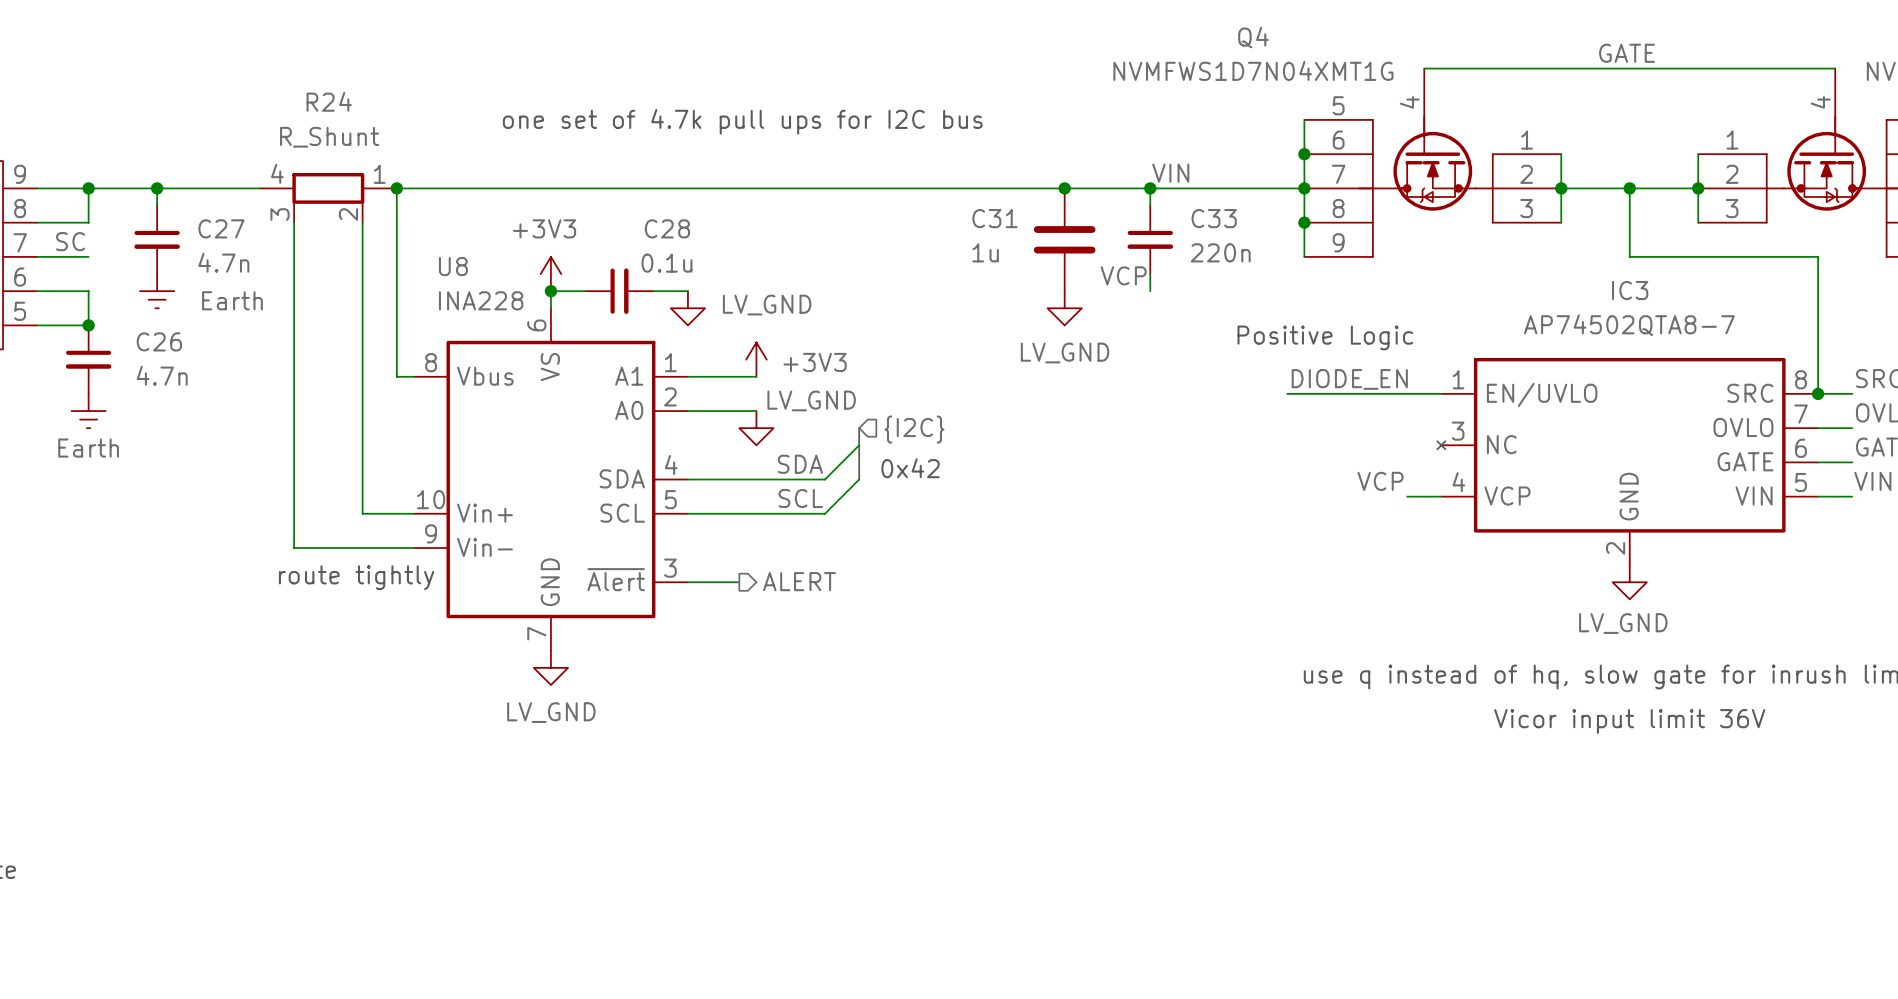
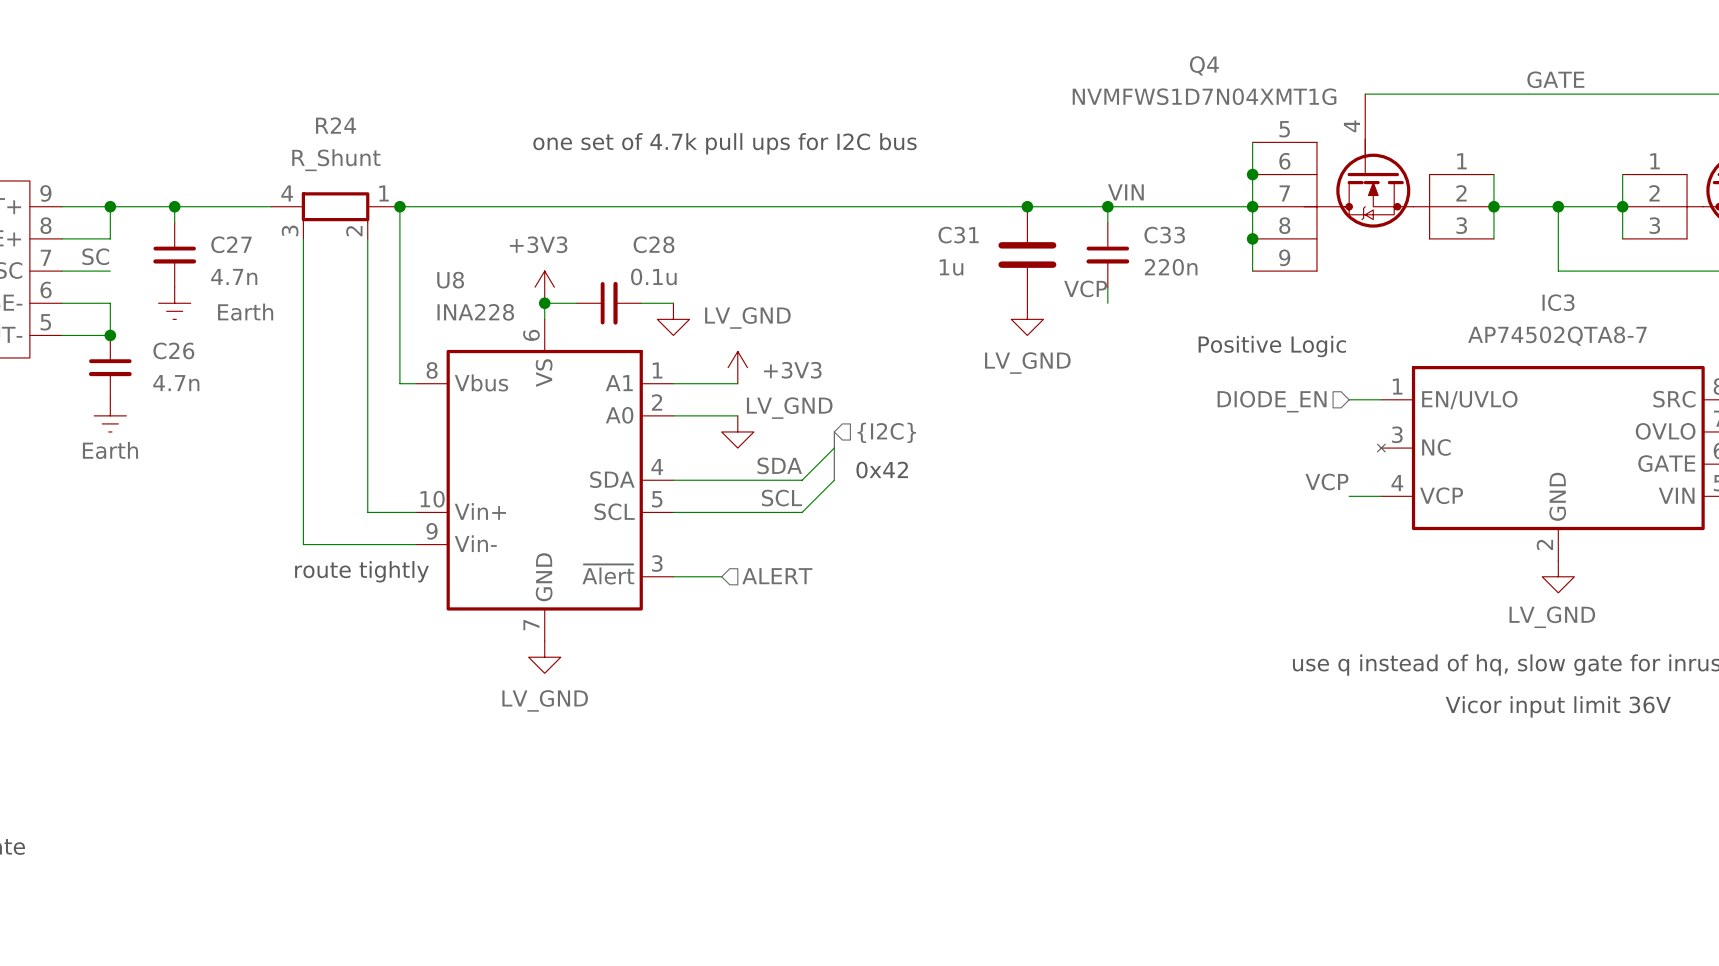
label: DIODE_EN (1349, 379) -> none
wire: (1287, 393) (1407, 393) -> none
hierarchical label: none -> DIODE_EN (1272, 401)
hierarchical label shape: output (799, 581) -> input (777, 576)

